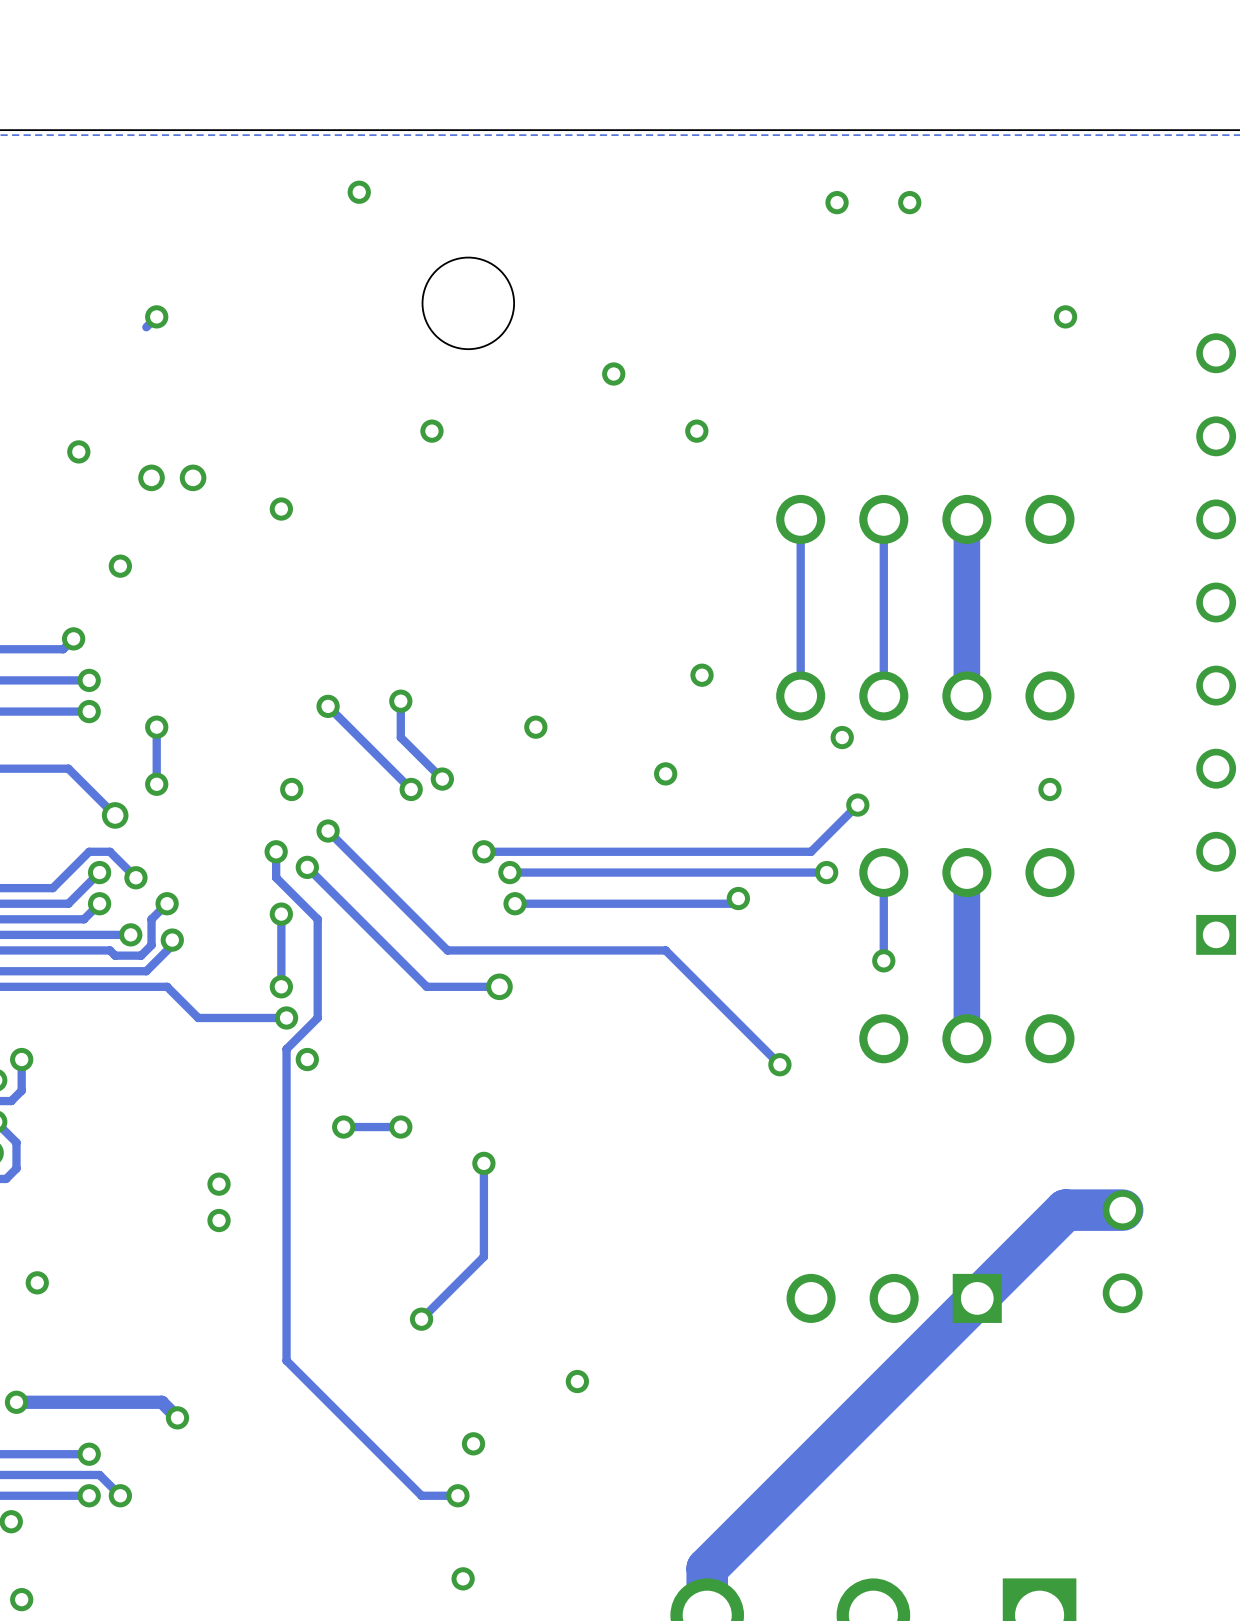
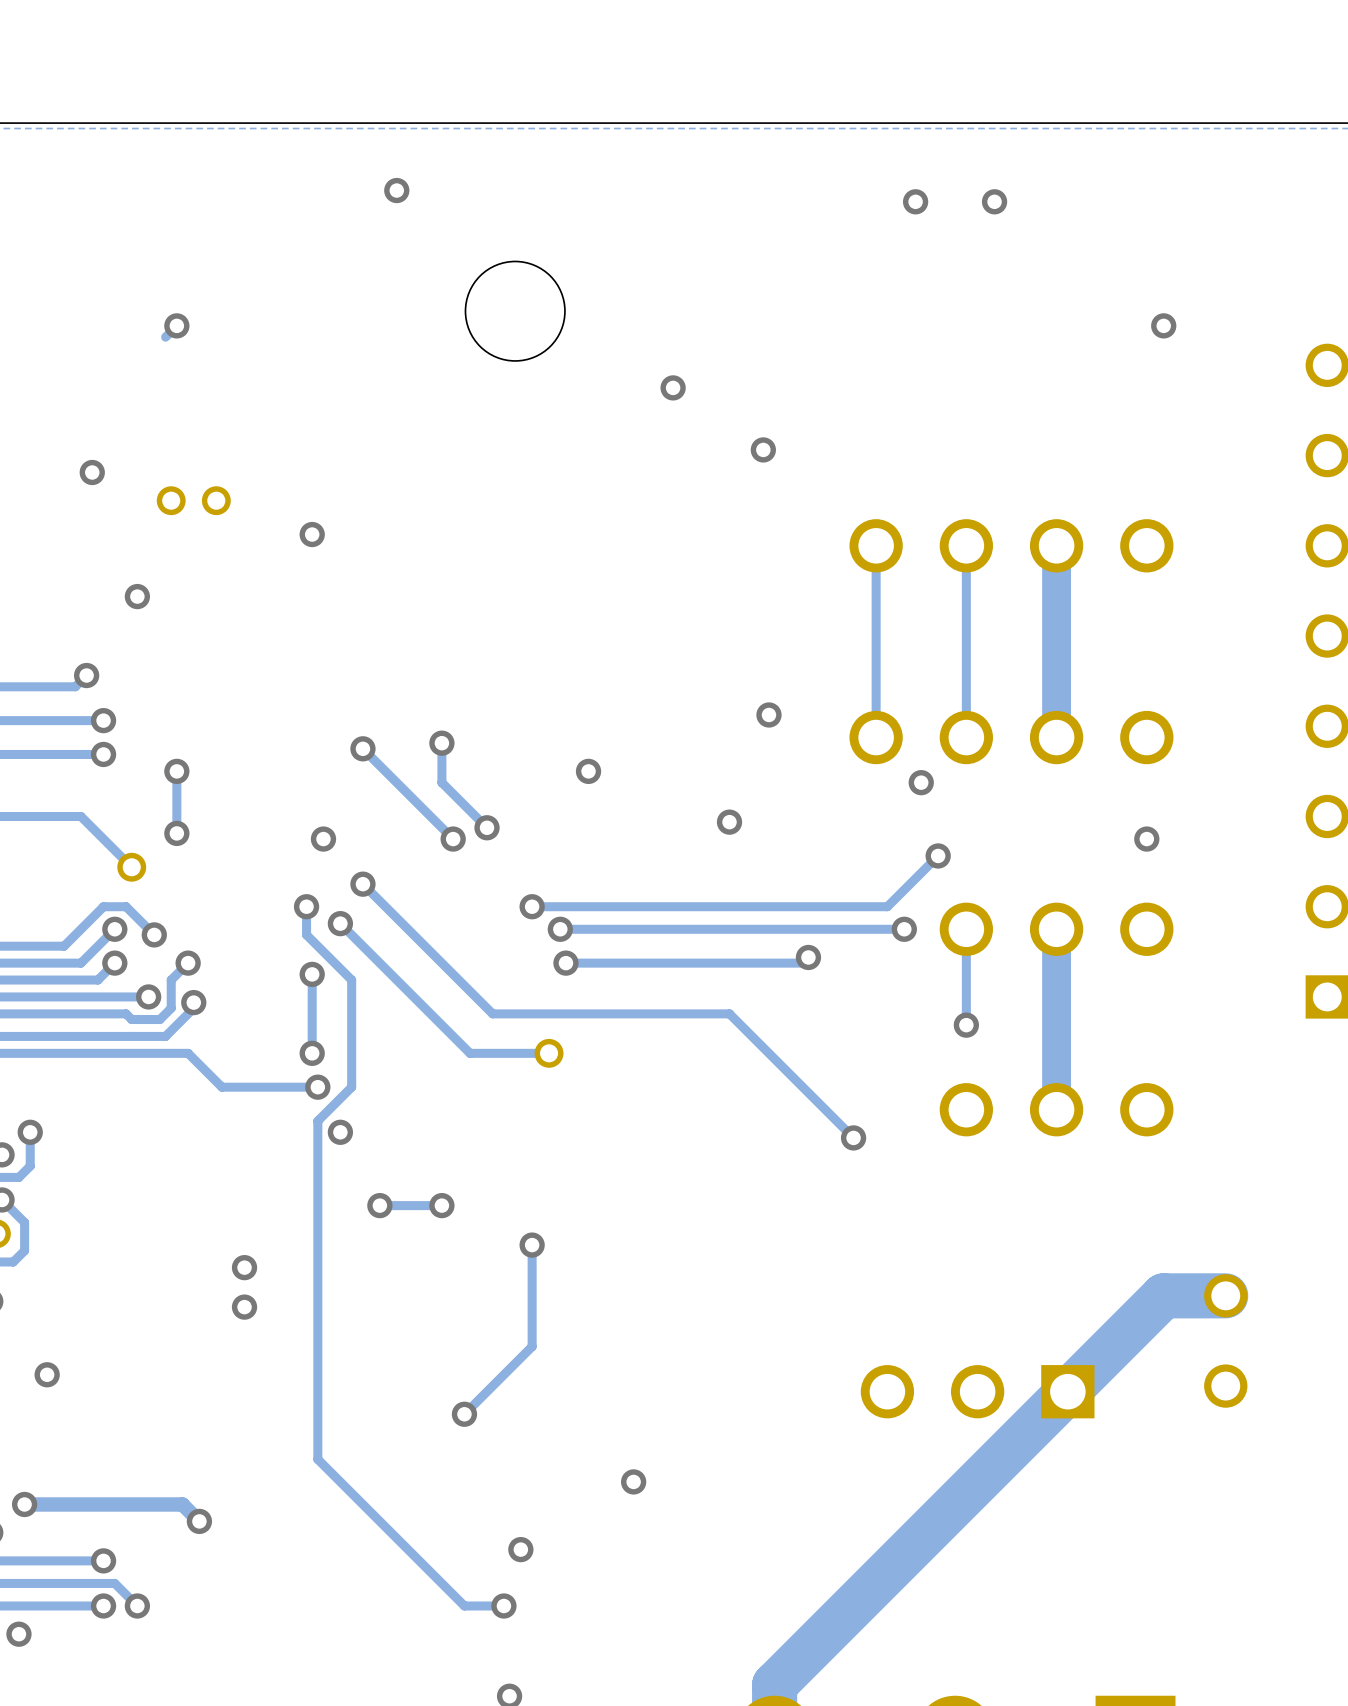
via: (431, 431) -> none

